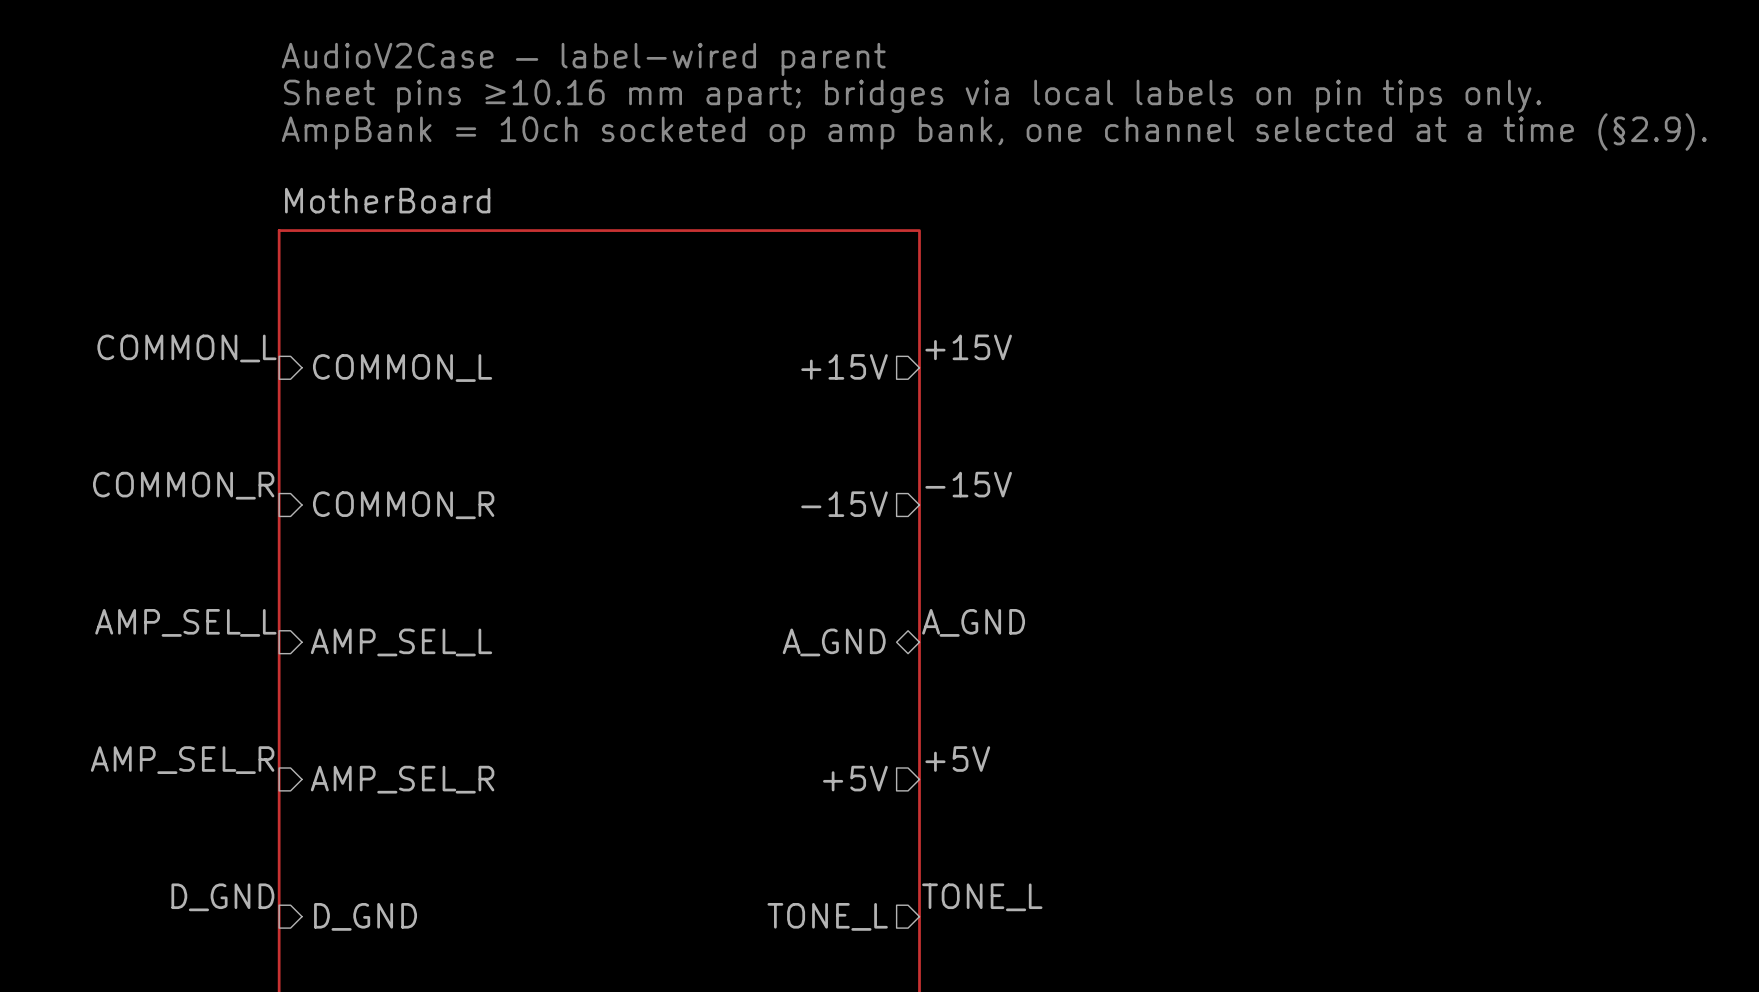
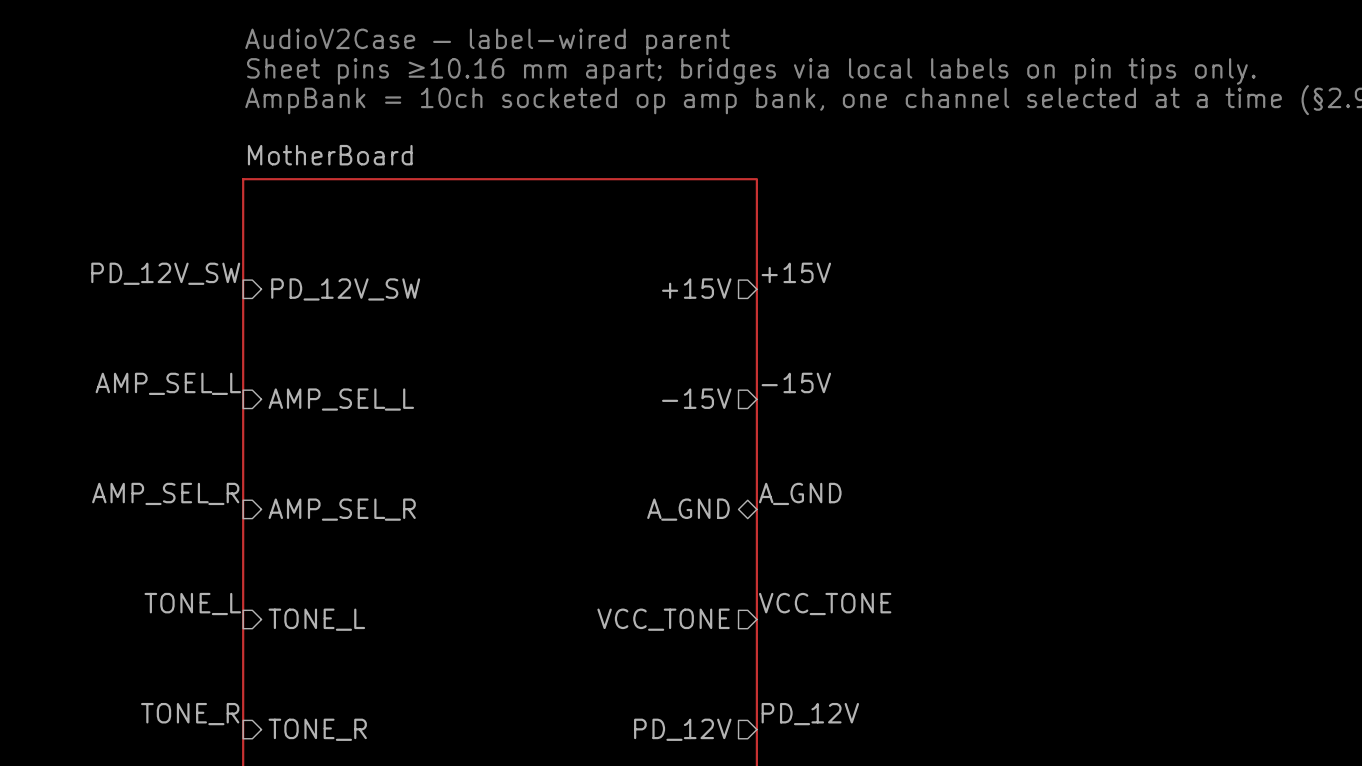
label: COMMON_L (186, 348) -> PD_12V_SW (165, 273)
sheet pin: COMMON_L (402, 368) -> PD_12V_SW (345, 289)
label: COMMON_R (183, 485) -> AMP_SEL_L (168, 383)
sheet pin: COMMON_R (403, 505) -> AMP_SEL_L (341, 399)
label: AMP_SEL_L (185, 622) -> AMP_SEL_R (165, 493)
sheet pin: AMP_SEL_L (401, 642) -> AMP_SEL_R (342, 509)
label: +5V (957, 759) -> VCC_TONE (825, 604)
label: AMP_SEL_R (182, 760) -> TONE_L (192, 604)
sheet pin: +5V (855, 778) -> VCC_TONE (663, 619)
sheet pin: AMP_SEL_R (402, 779) -> TONE_L (316, 619)
label: D_GND (222, 897) -> TONE_R (190, 714)
label: TONE_L (982, 897) -> PD_12V (810, 714)
sheet pin: D_GND (365, 916) -> TONE_R (317, 729)
sheet pin: TONE_L (827, 916) -> PD_12V (682, 729)

